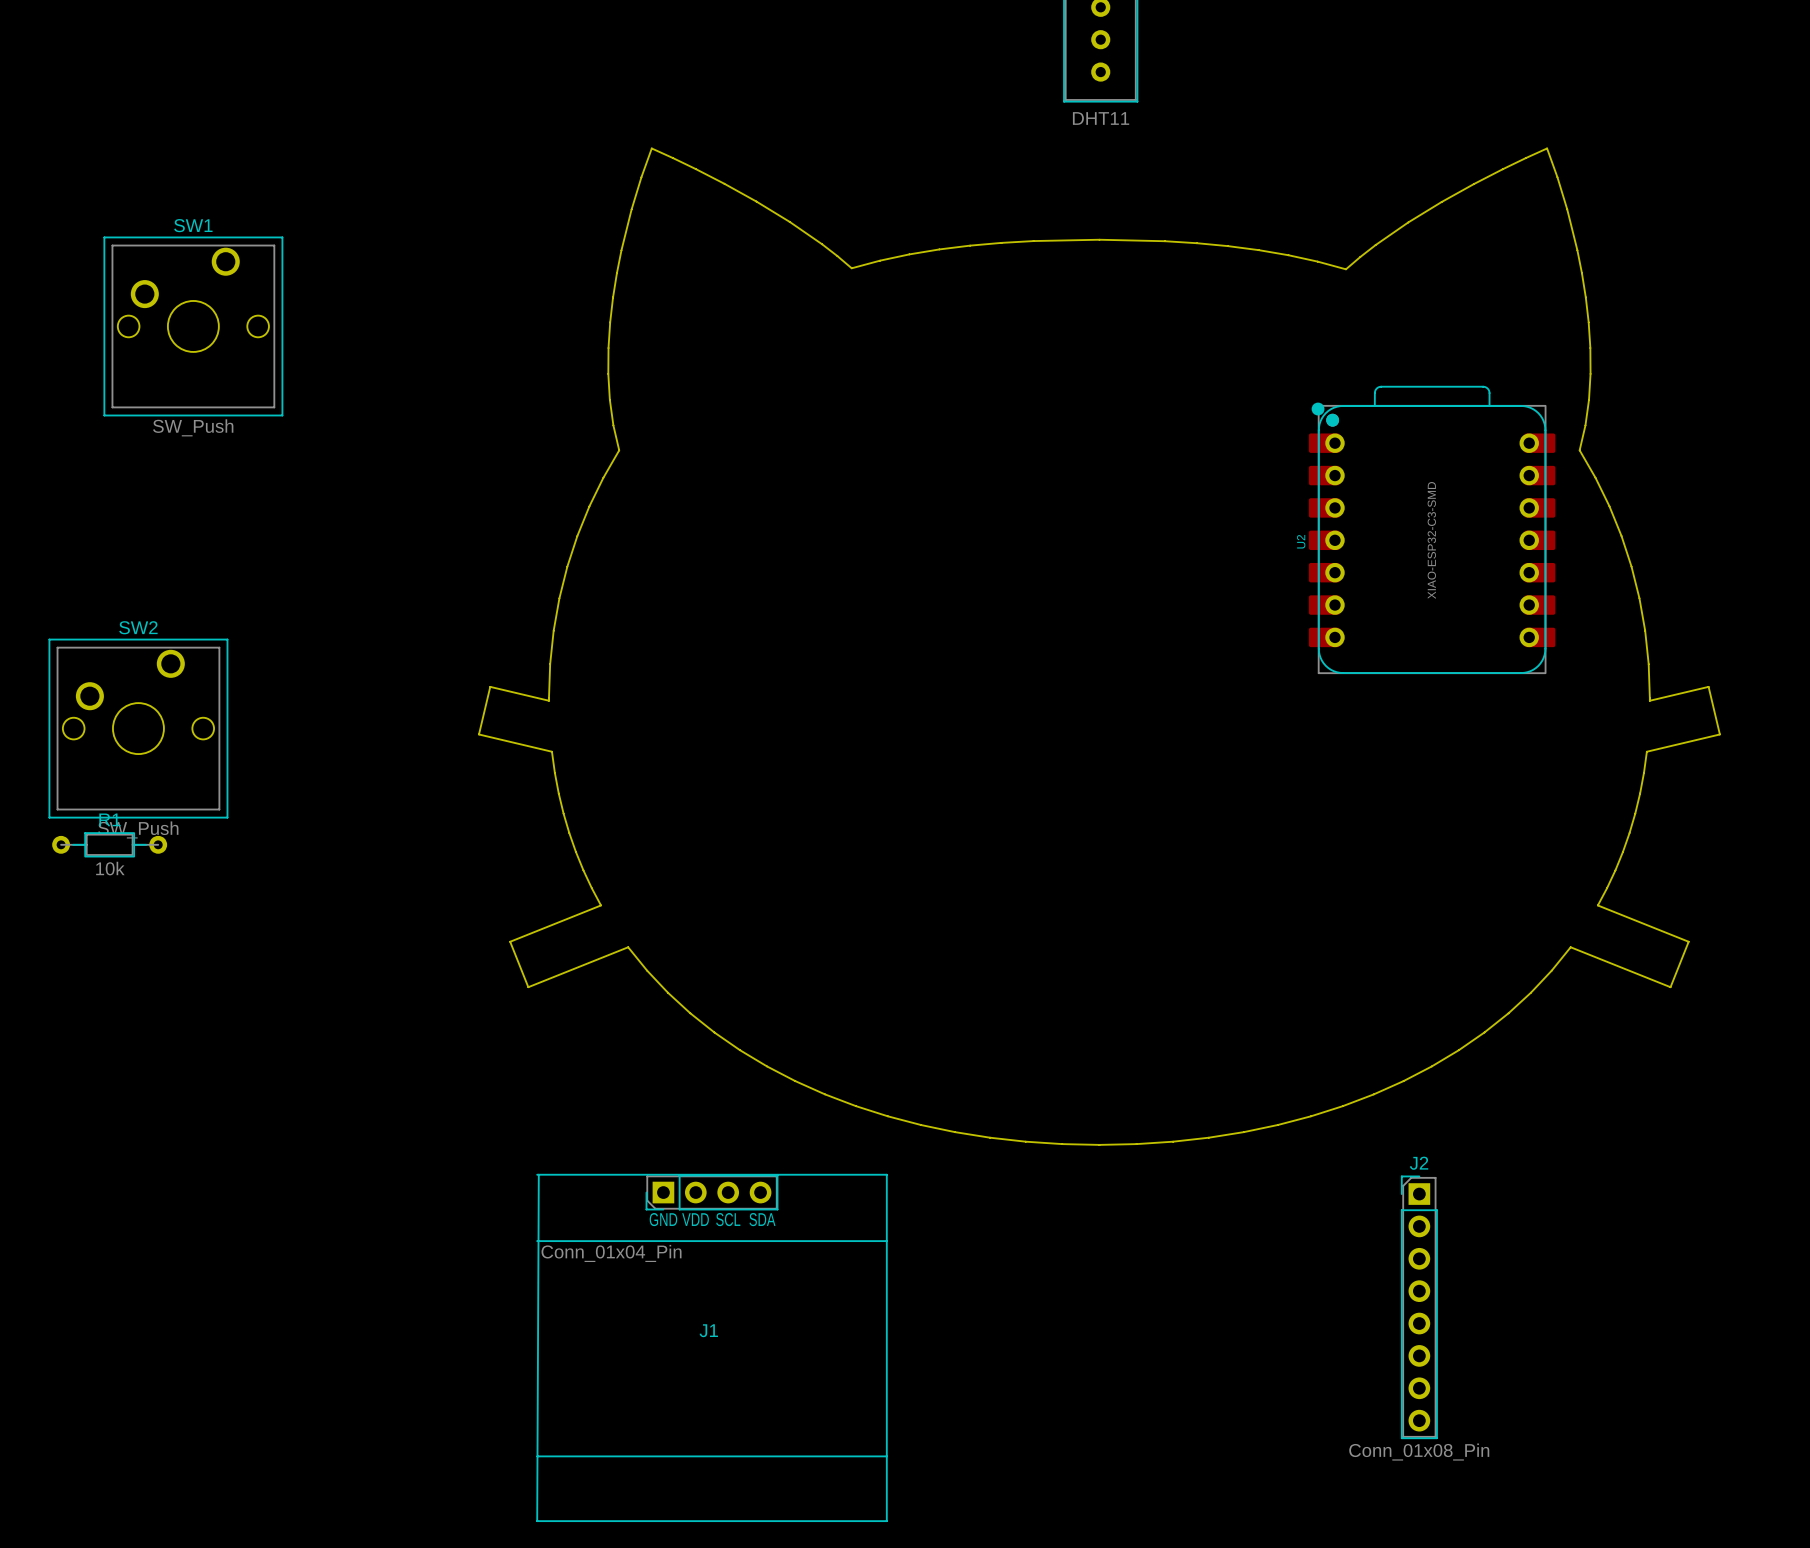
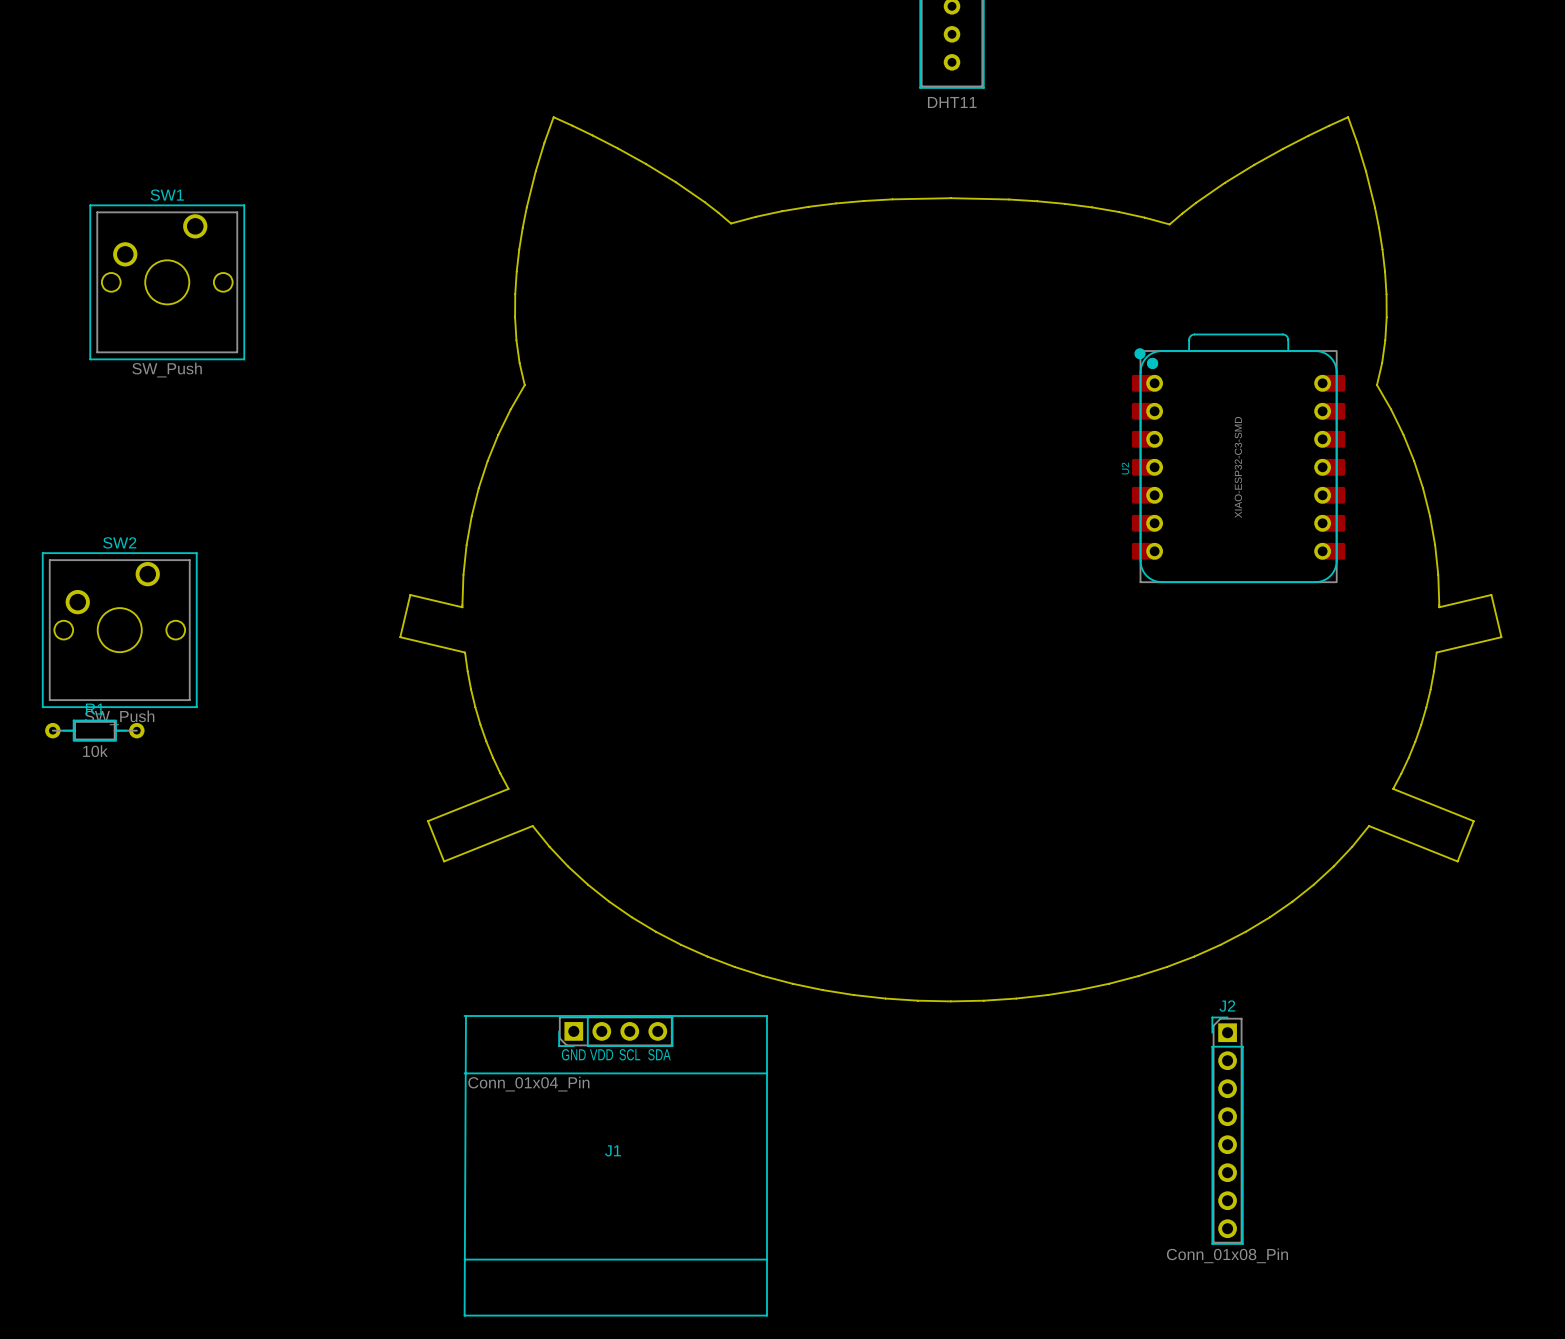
board edge: (651, 148) (631, 209) (621, 250) (610, 322) (608, 373) (609, 399) (619, 450) (589, 506) (567, 566) (553, 630) (549, 700) (490, 686) (478, 734) (551, 751) (558, 793) (569, 833) (583, 870) (601, 905) (510, 941) (528, 987) (628, 947) (667, 992) (714, 1032) (766, 1066) (825, 1094) (887, 1116) (955, 1132) (1025, 1141) (1099, 1144) (1173, 1141) (1243, 1132) (1310, 1116) (1373, 1094) (1431, 1066) (1484, 1032) (1530, 992) (1570, 947) (1670, 987) (1688, 941) (1597, 905) (1615, 870) (1629, 833) (1640, 793) (1646, 751) (1719, 734) (1708, 686) (1649, 700) (1645, 630) (1631, 566) (1609, 506) (1579, 450) (1589, 399) (1590, 373) (1588, 322) (1577, 250) (1567, 209) (1547, 148) (1502, 169) (1441, 202) (1375, 245) (1345, 269) (1288, 255) (1228, 246) (1164, 241) (1099, 239) (1033, 241) (970, 245) (909, 254) (851, 268) (822, 244) (756, 201) (695, 169) (651, 148) -> (553, 117) (535, 171) (526, 207) (516, 271) (516, 340) (524, 385) (498, 434) (478, 488) (466, 545) (462, 607) (410, 594) (400, 637) (465, 652) (471, 689) (480, 724) (493, 757) (508, 788) (428, 821) (444, 861) (532, 826) (567, 866) (609, 901) (655, 931) (707, 956) (763, 976) (822, 990) (885, 998) (950, 1001) (1016, 998) (1078, 990) (1138, 976) (1194, 956) (1245, 931) (1292, 901) (1333, 866) (1369, 826) (1457, 861) (1473, 821) (1393, 788) (1408, 757) (1421, 724) (1430, 689) (1436, 652) (1501, 637) (1491, 594) (1439, 607) (1435, 545) (1423, 488) (1403, 434) (1377, 385) (1385, 340) (1385, 271) (1375, 207) (1366, 171) (1348, 117) (1254, 164) (1195, 202) (1169, 224) (1118, 211) (1065, 203) (1008, 199) (950, 198) (836, 203) (782, 211) (731, 223) (704, 202) (646, 164) (553, 117)

